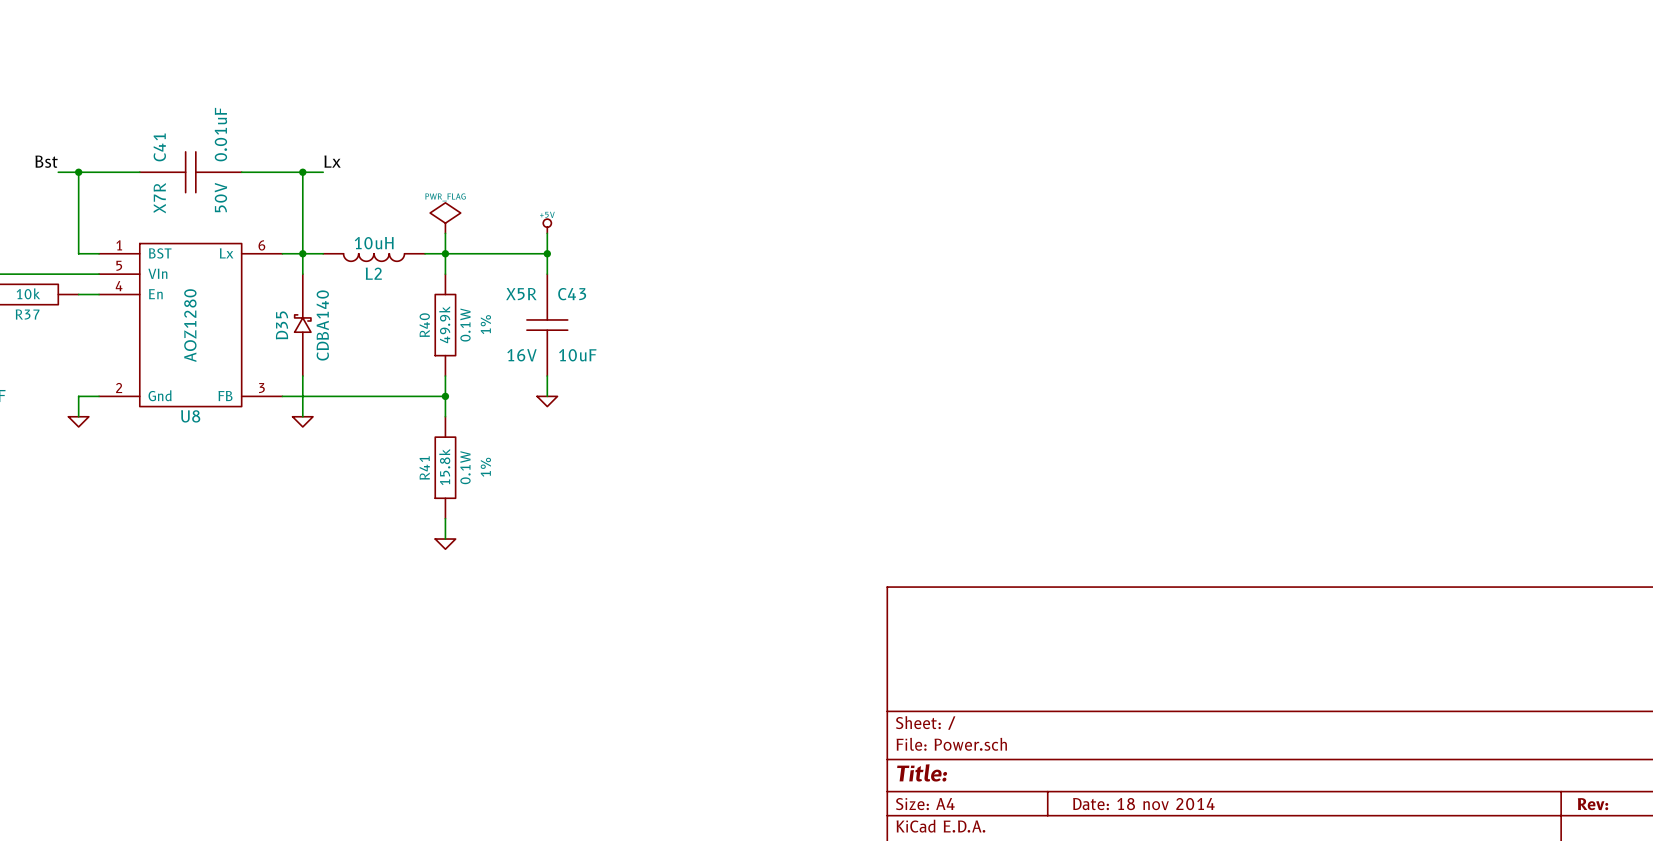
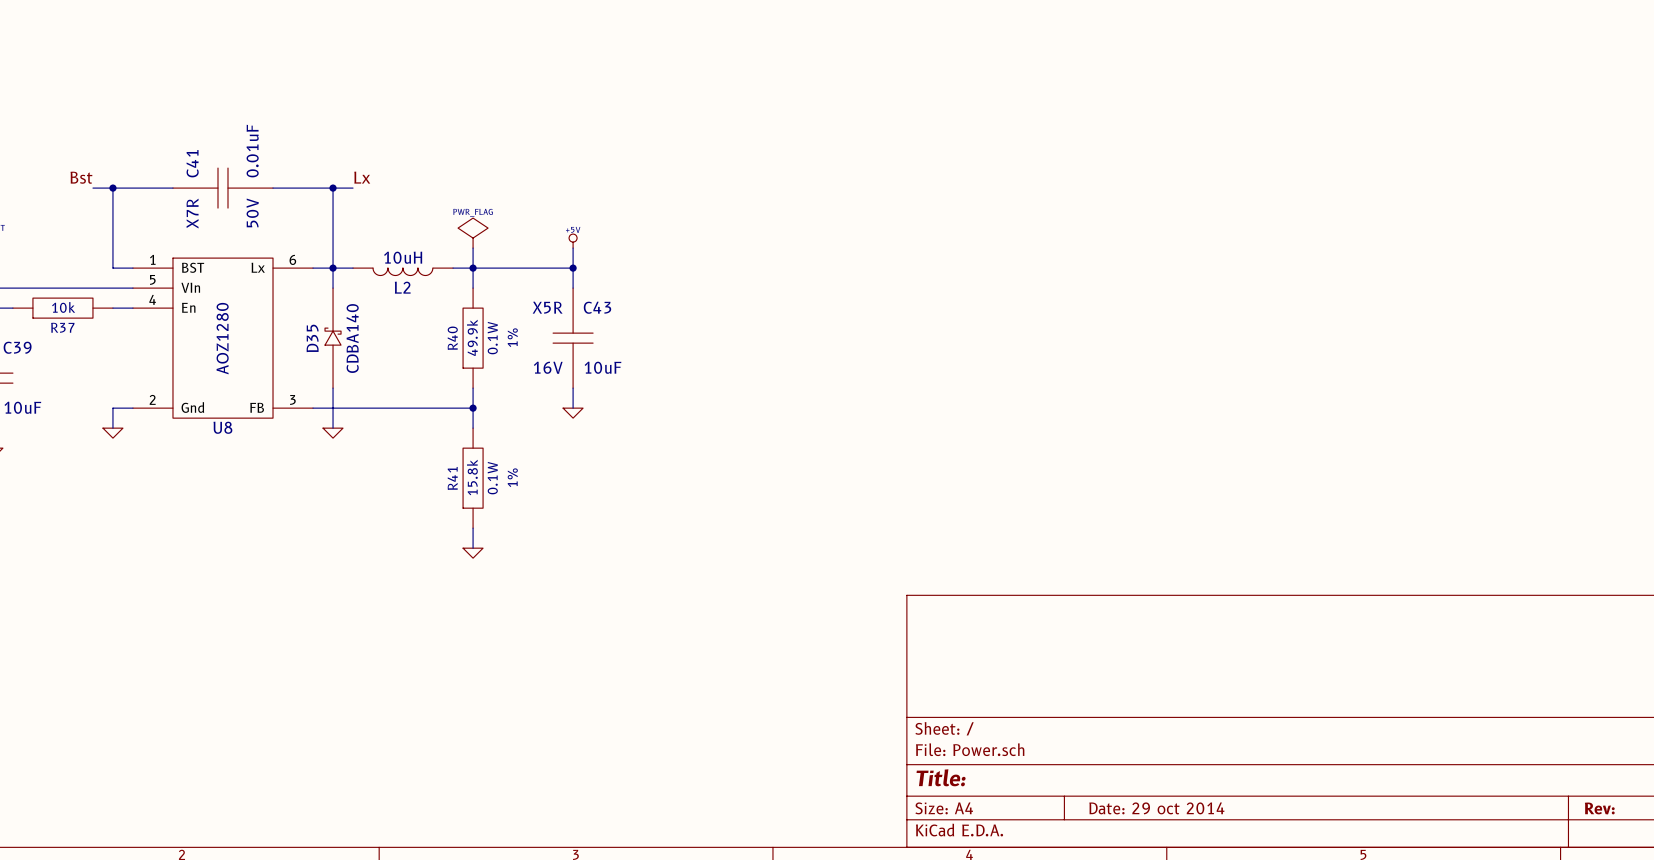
title block: Date: 18 nov 2014 (1143, 804) -> Date: 29 oct 2014 (1156, 808)

